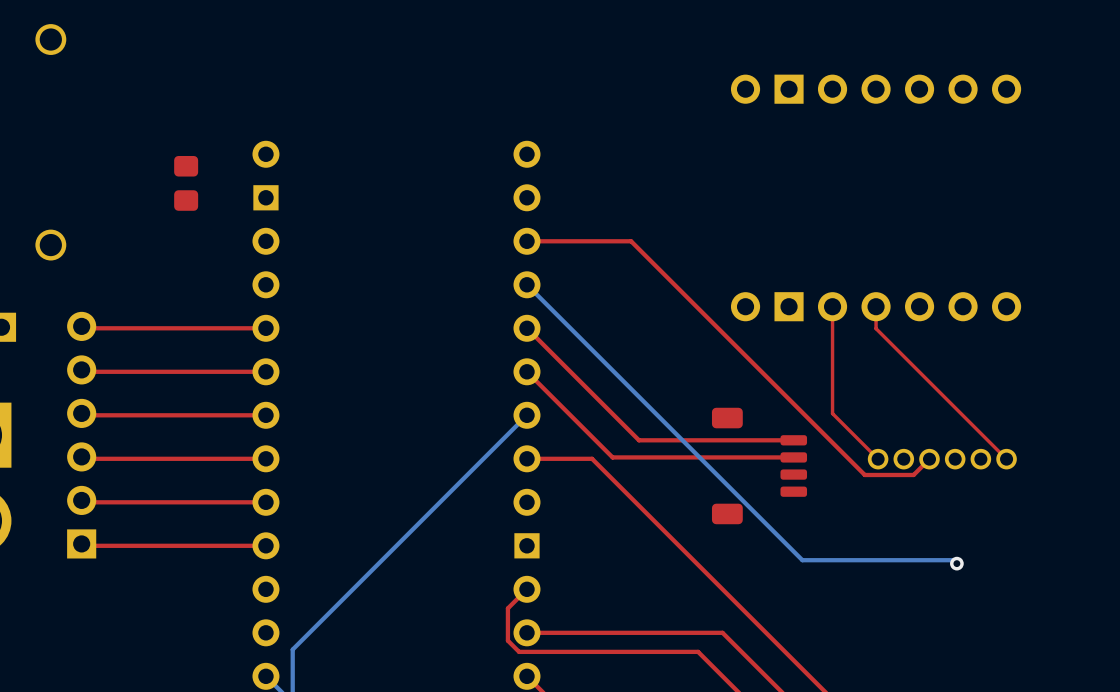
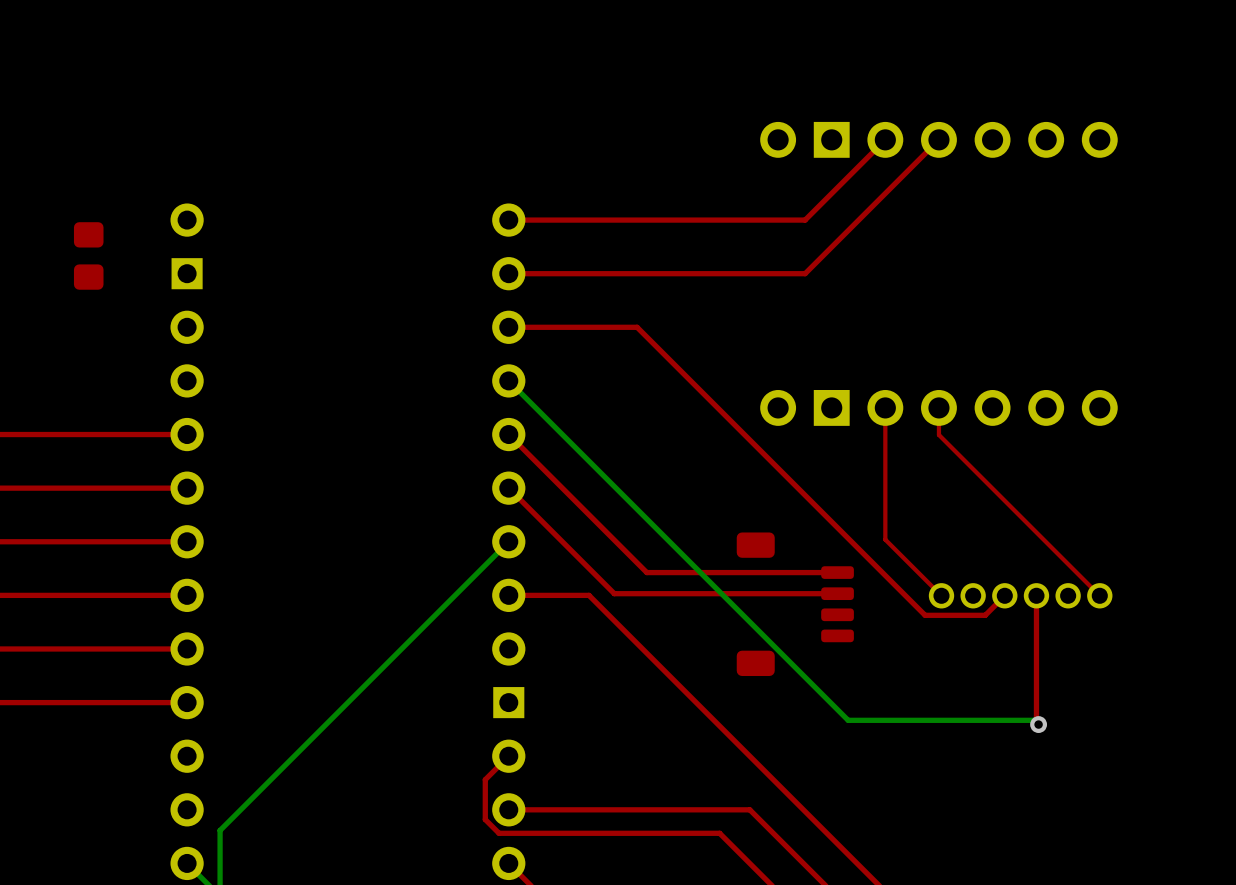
top track: none -> (885, 139) (805, 220) (508, 220)
top track: none -> (938, 139) (805, 273) (508, 273)
top track: none -> (1036, 595) (1036, 722)

